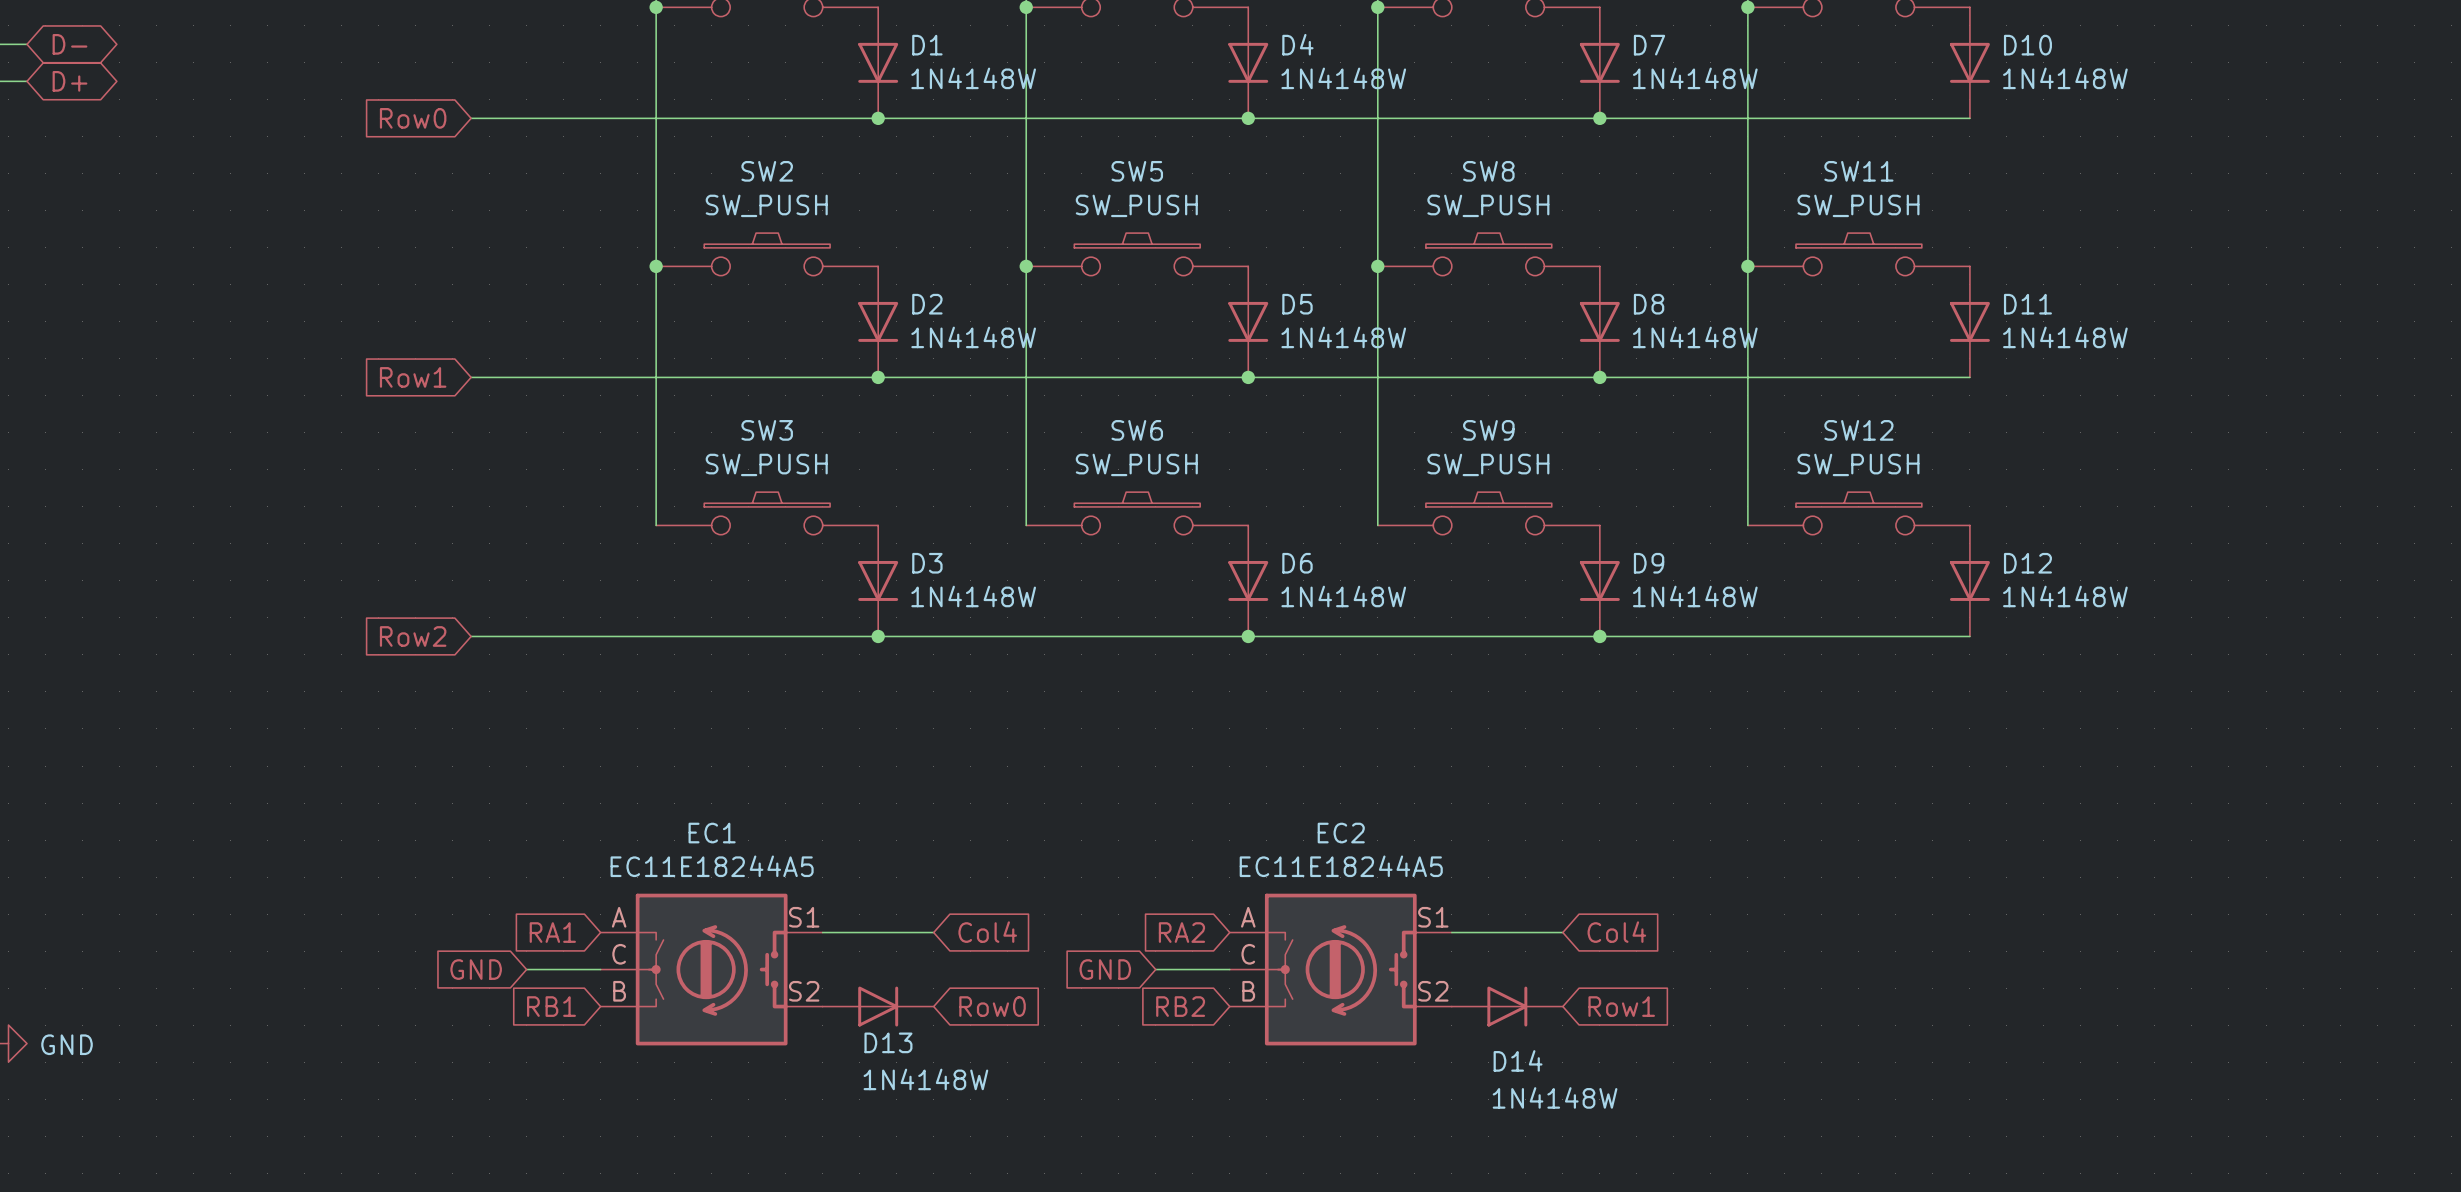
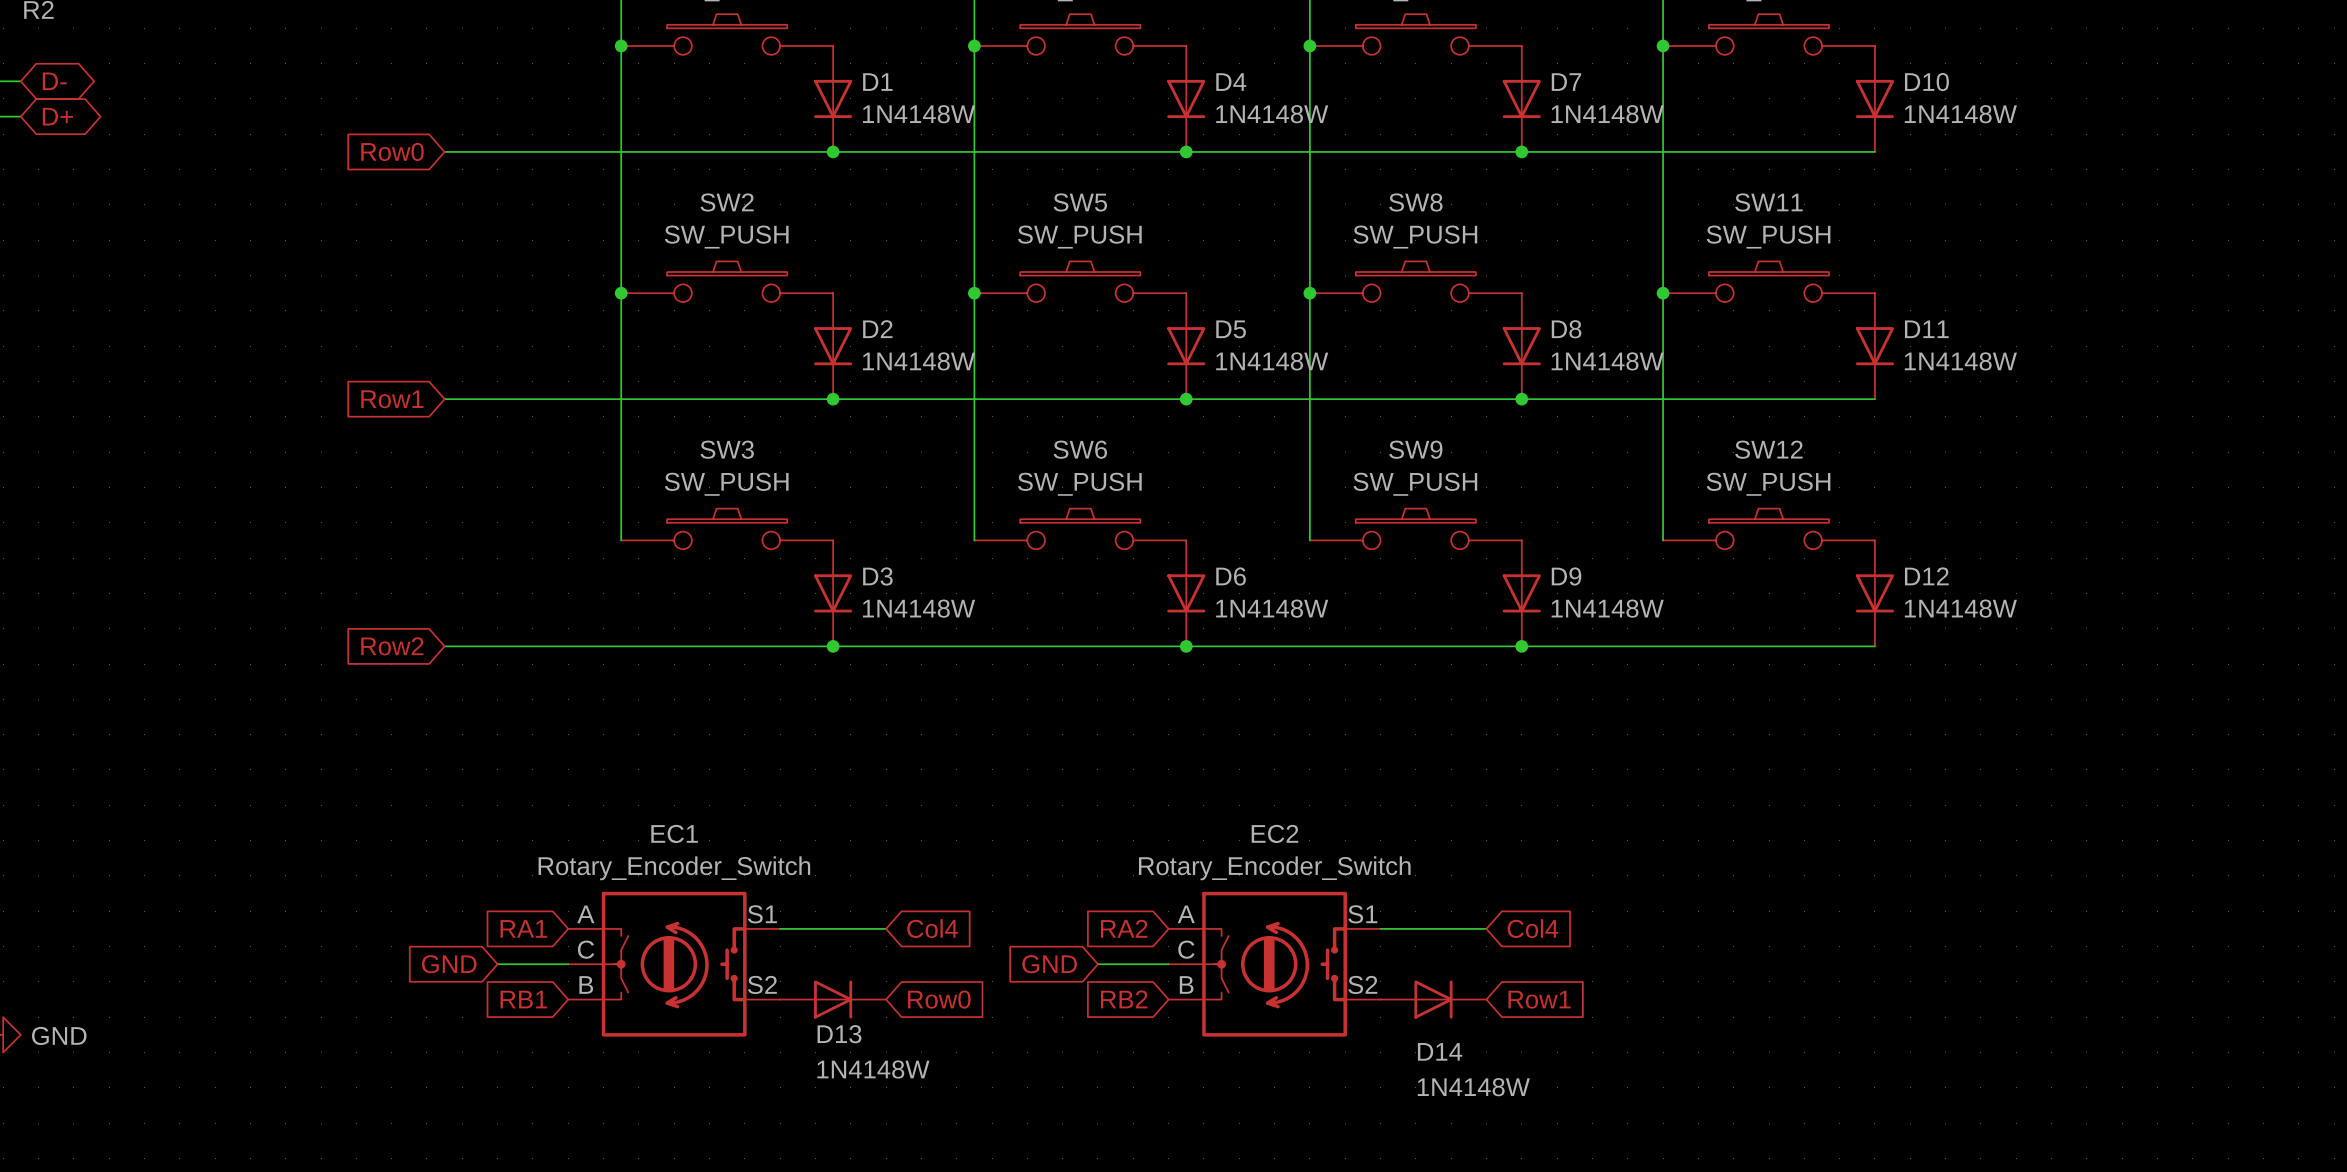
EC1 value: EC11E18244A5 (712, 866) -> Rotary_Encoder_Switch (674, 868)
EC2 value: EC11E18244A5 (1341, 866) -> Rotary_Encoder_Switch (1274, 868)

